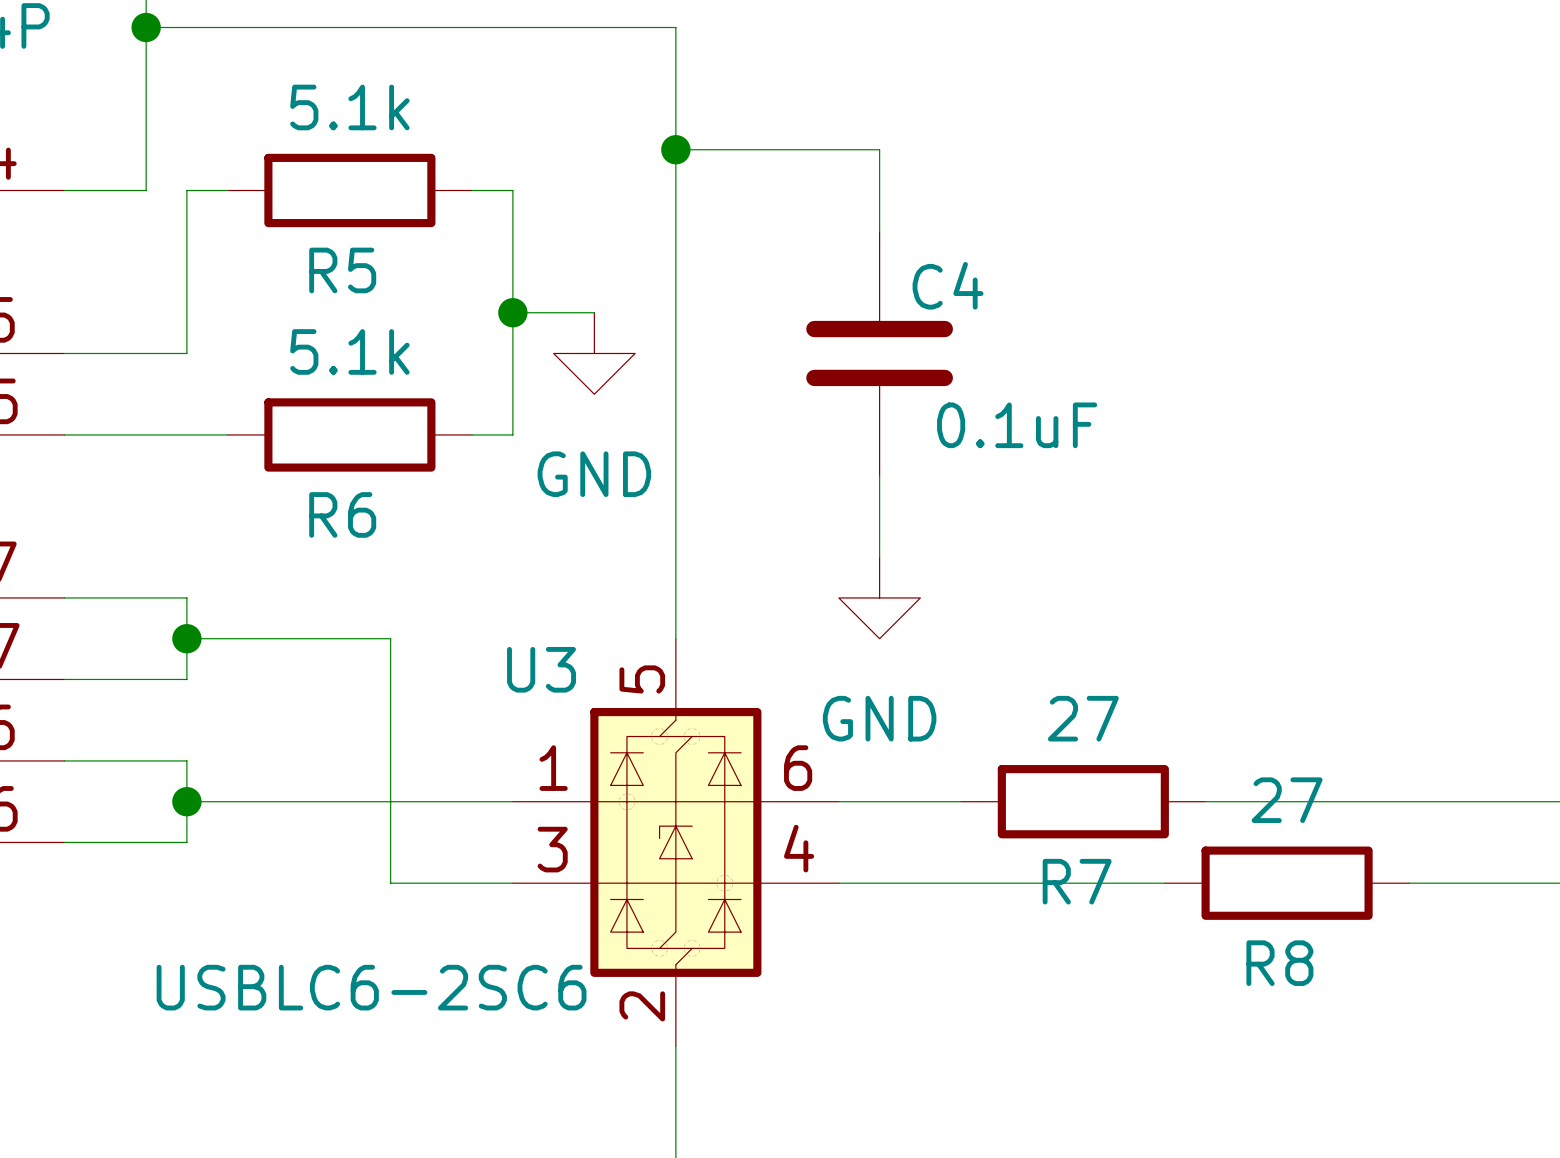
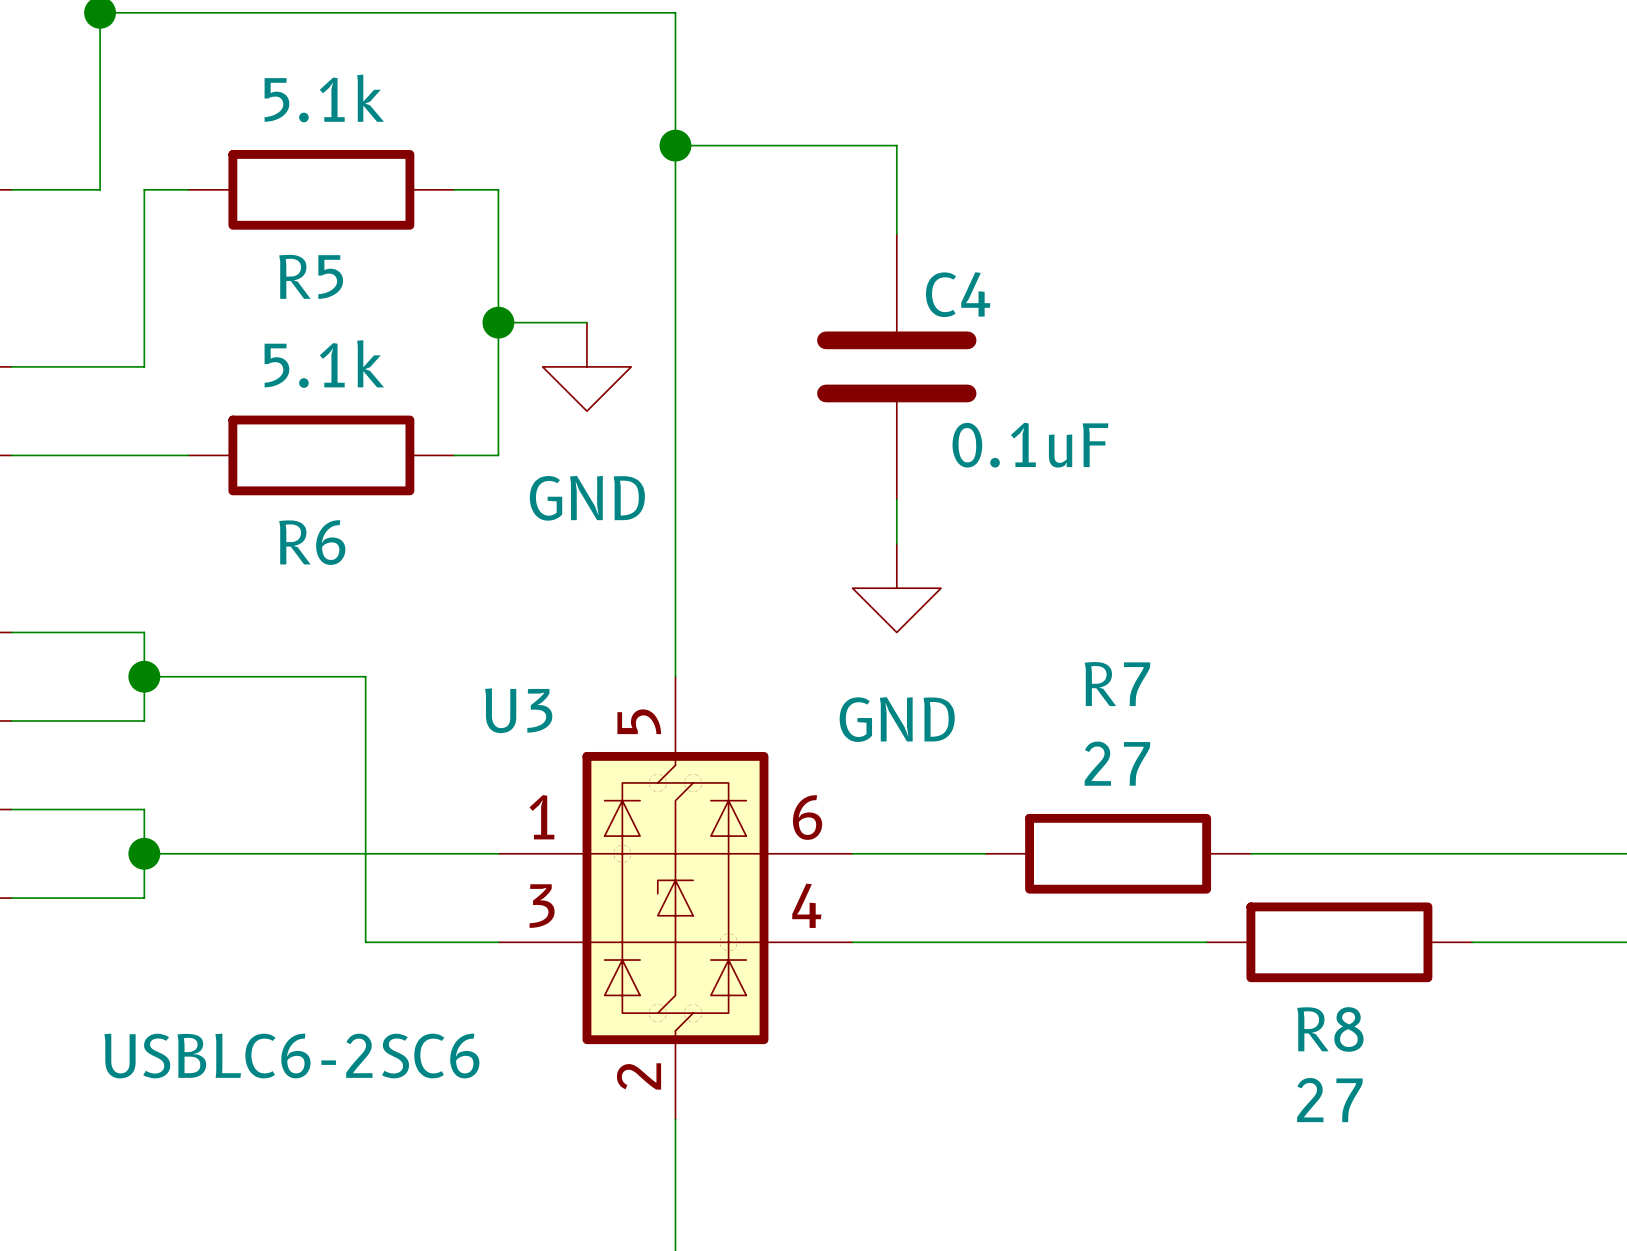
power symbol position: GND (879, 597) -> GND (896, 588)
R8 value position: 27 (1287, 800) -> 27 (1329, 1100)
R7 name position: R7 (1077, 881) -> R7 (1117, 684)

